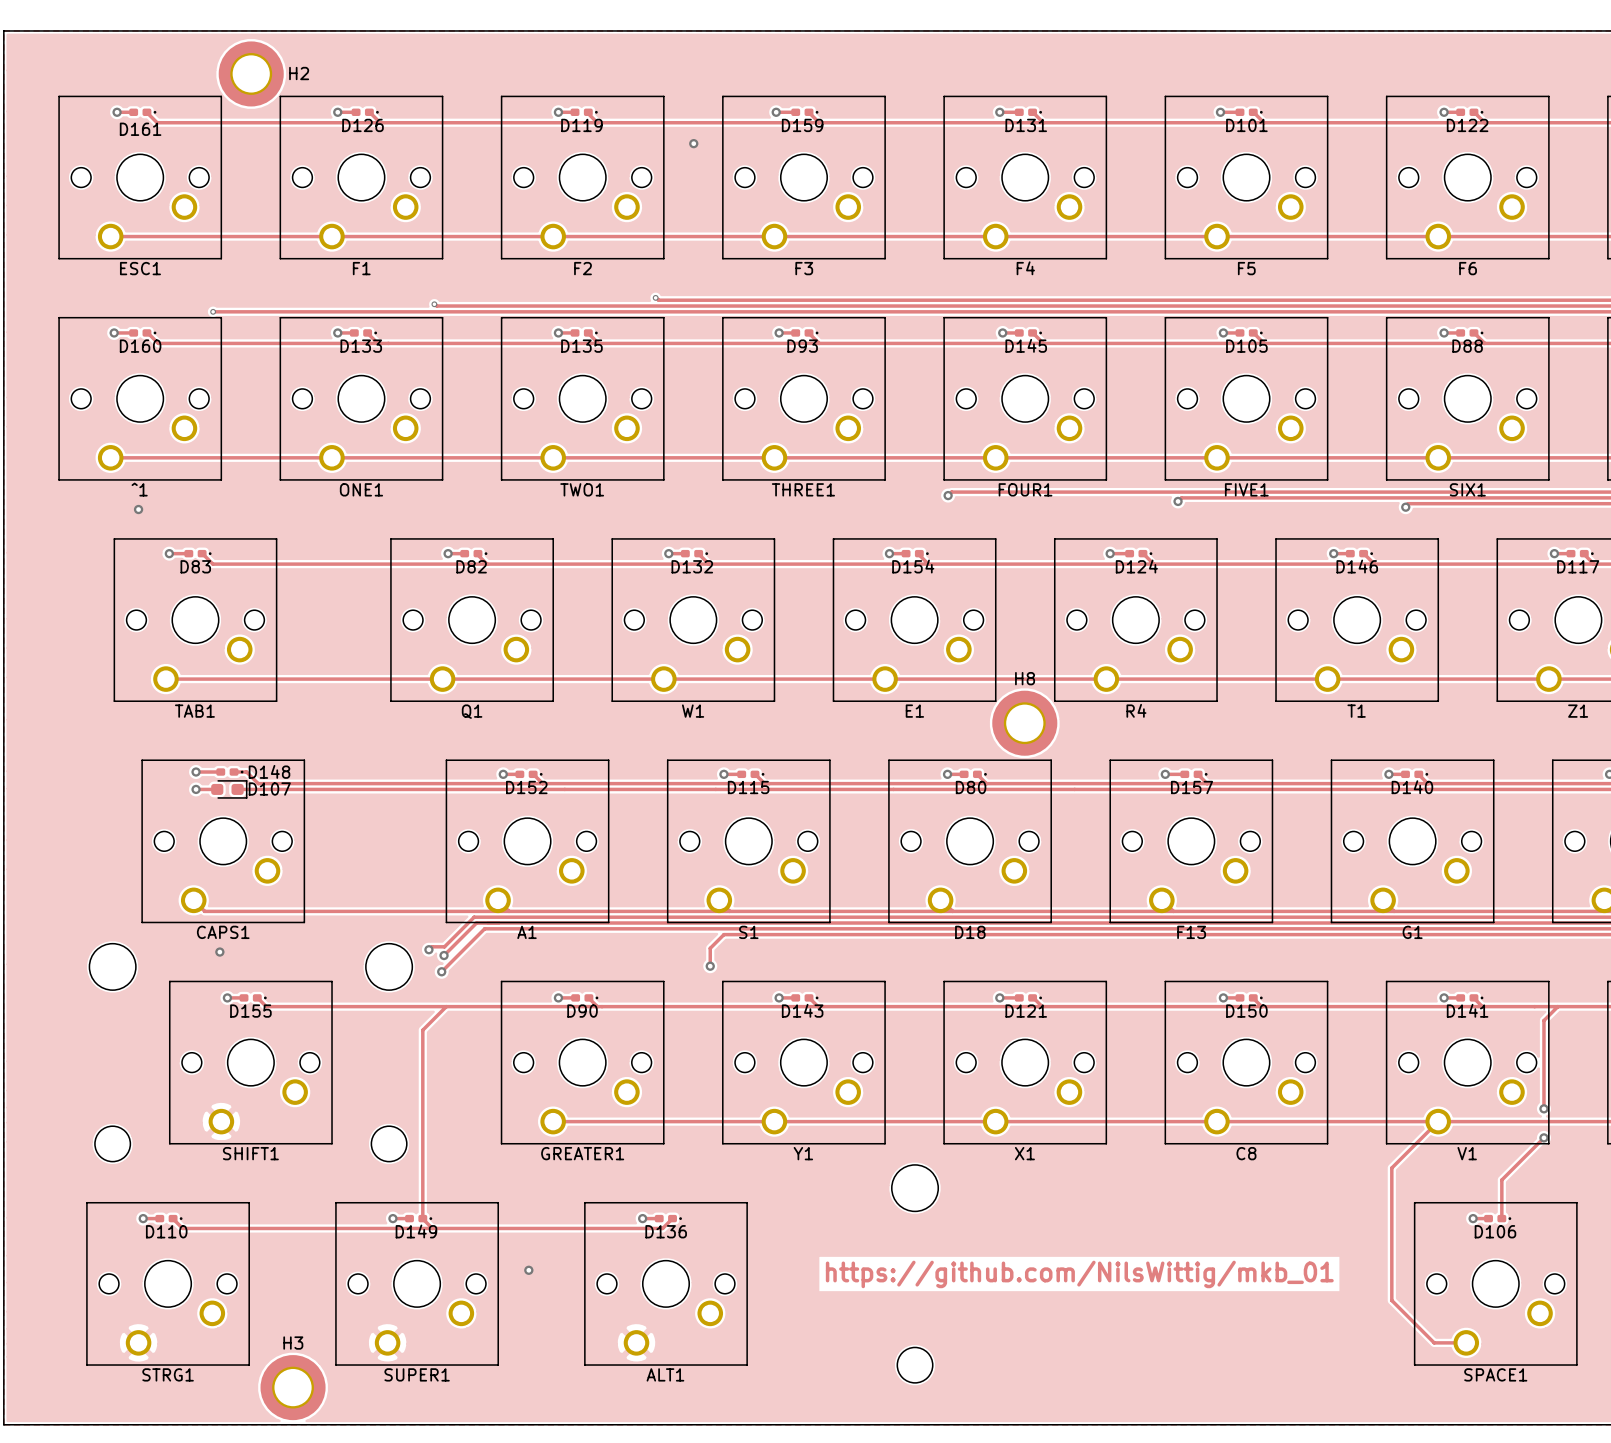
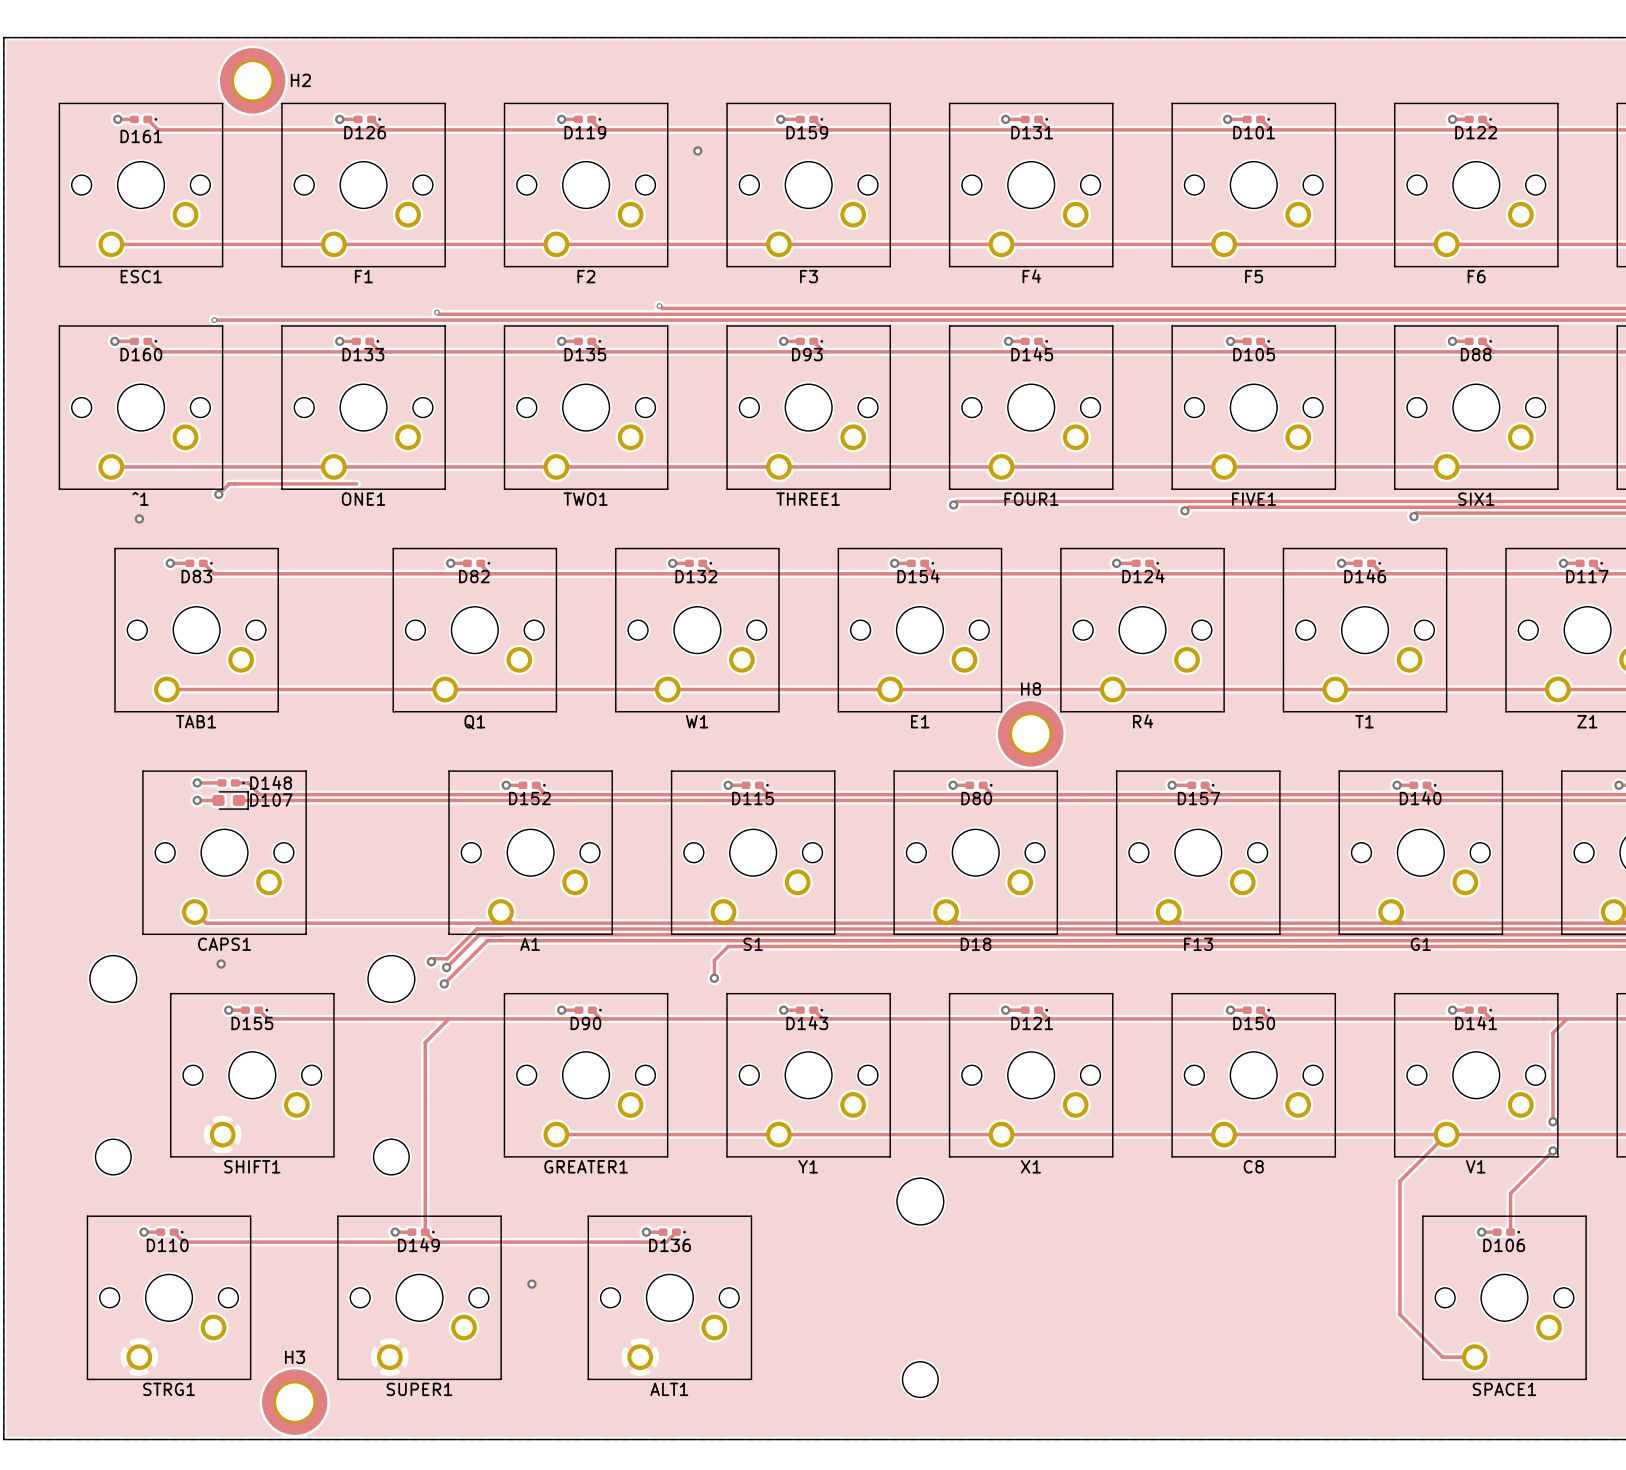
track: none -> (356, 483) (229, 483) (218, 494)
via: none -> (218, 494)
text: https://github.com/NilsWittig/mkb_01 (1079, 1274) -> none

